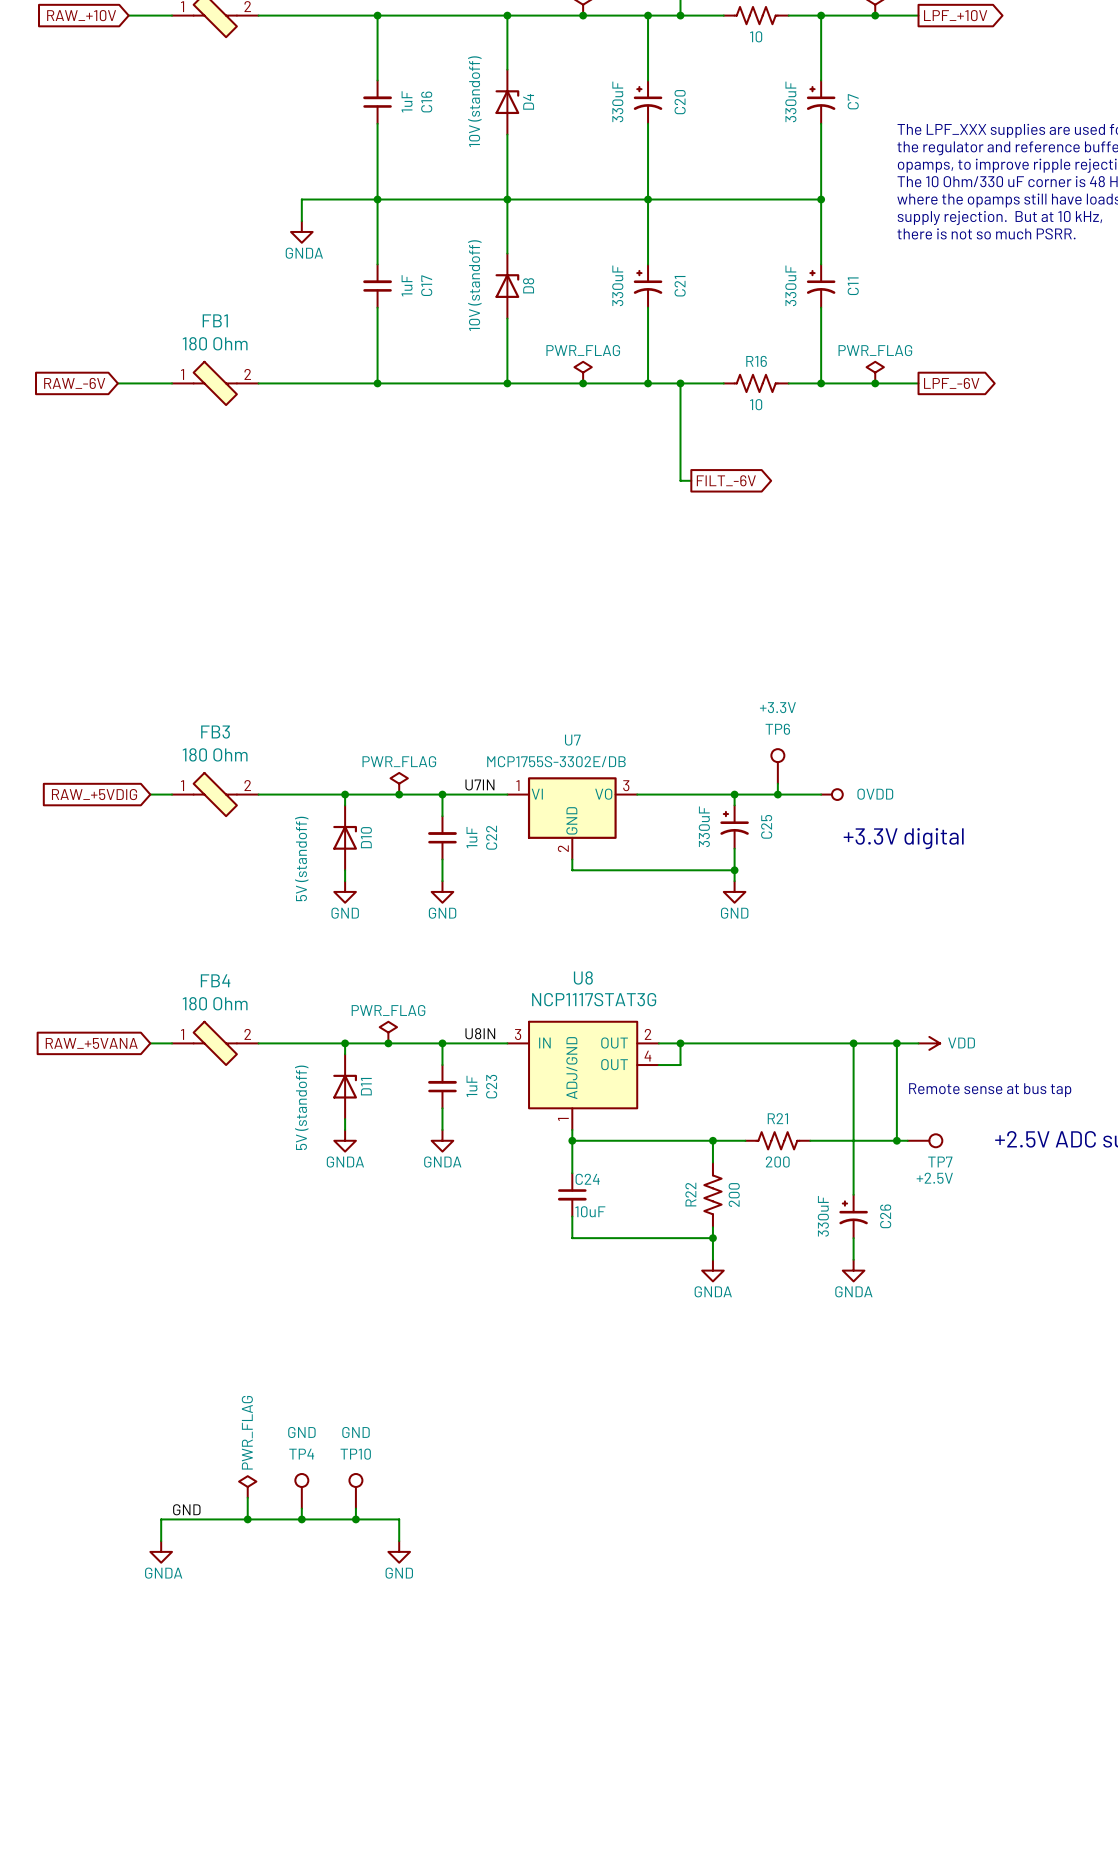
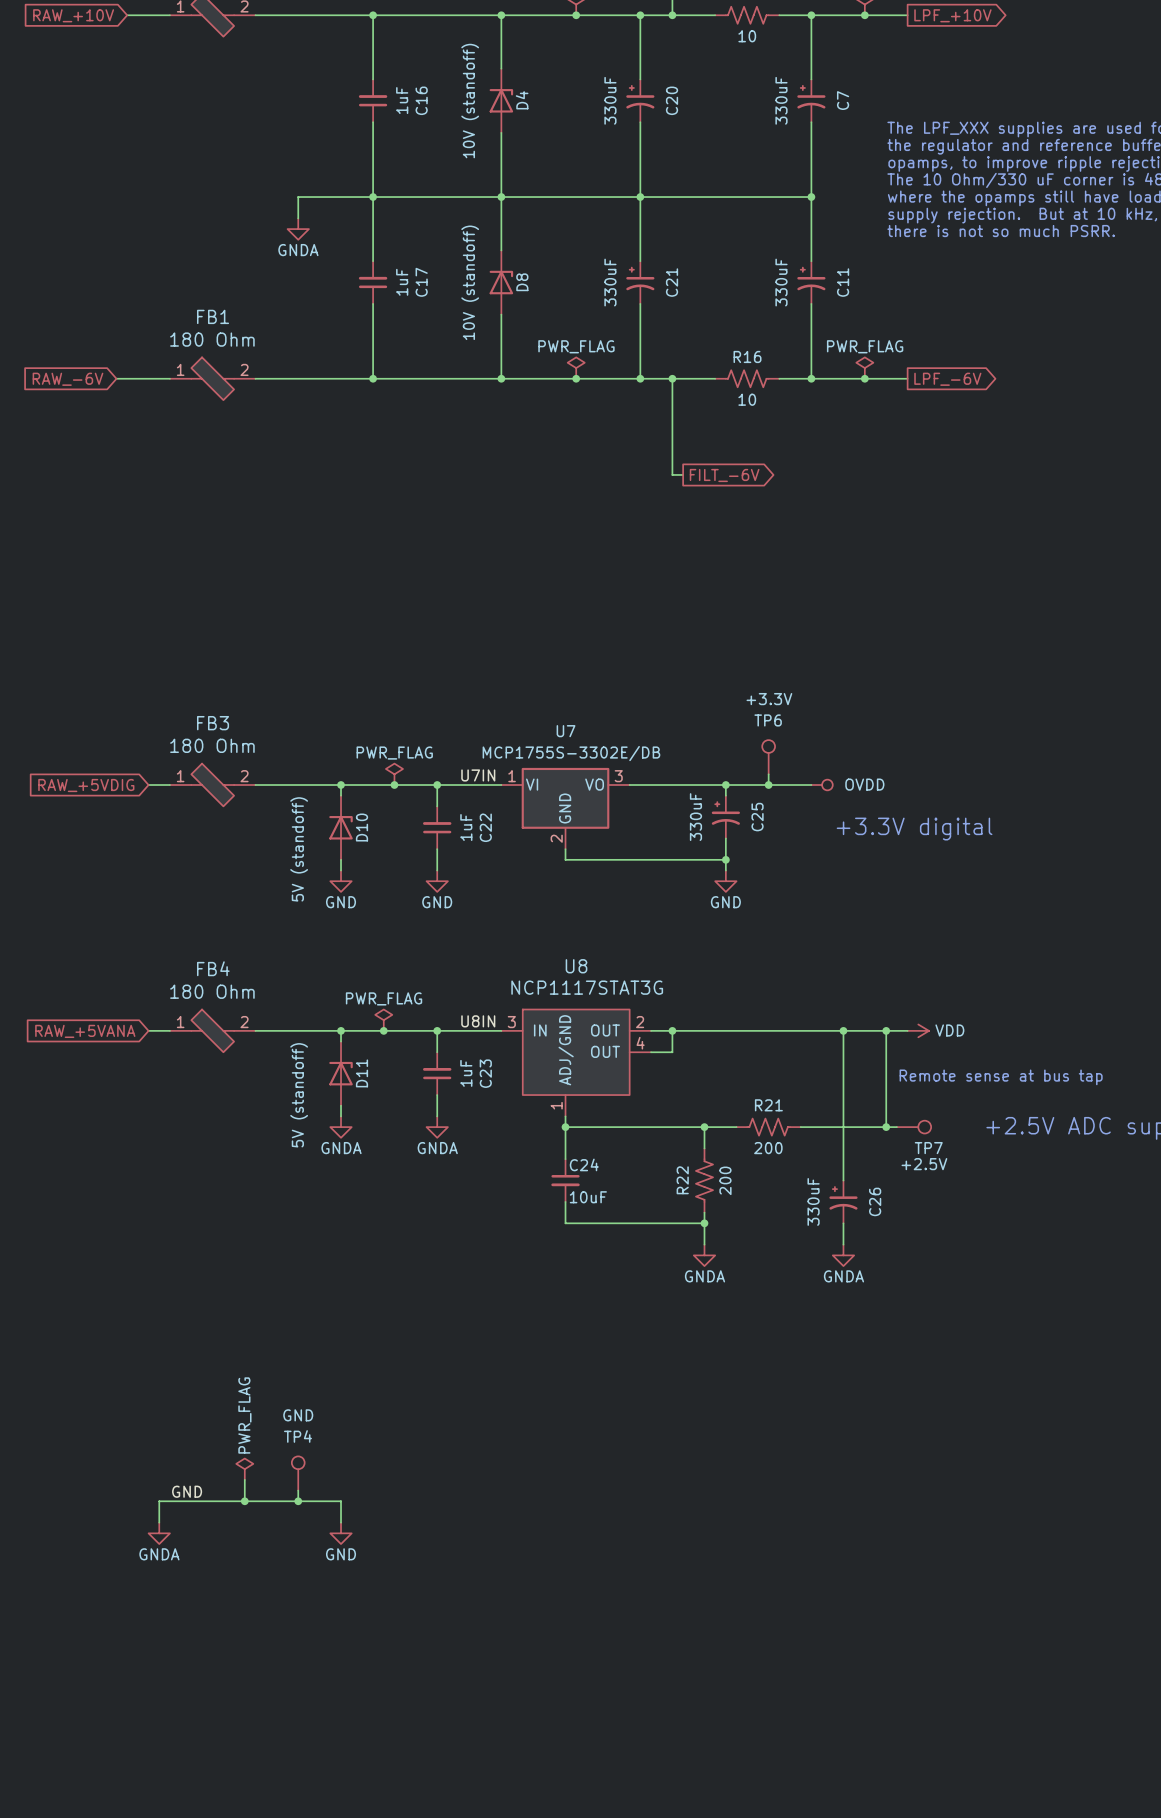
TP10: GND (355, 1491) -> none
wire: (355, 1508) (355, 1519) -> none
wire: (345, 1519) (399, 1519) (399, 1541) -> (341, 1501) (341, 1522)
junction: (355, 1519) -> none
power symbol position: GND (399, 1551) -> GND (341, 1533)

